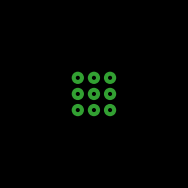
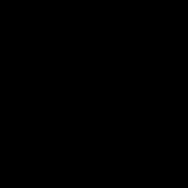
part: (93, 93) -> none

